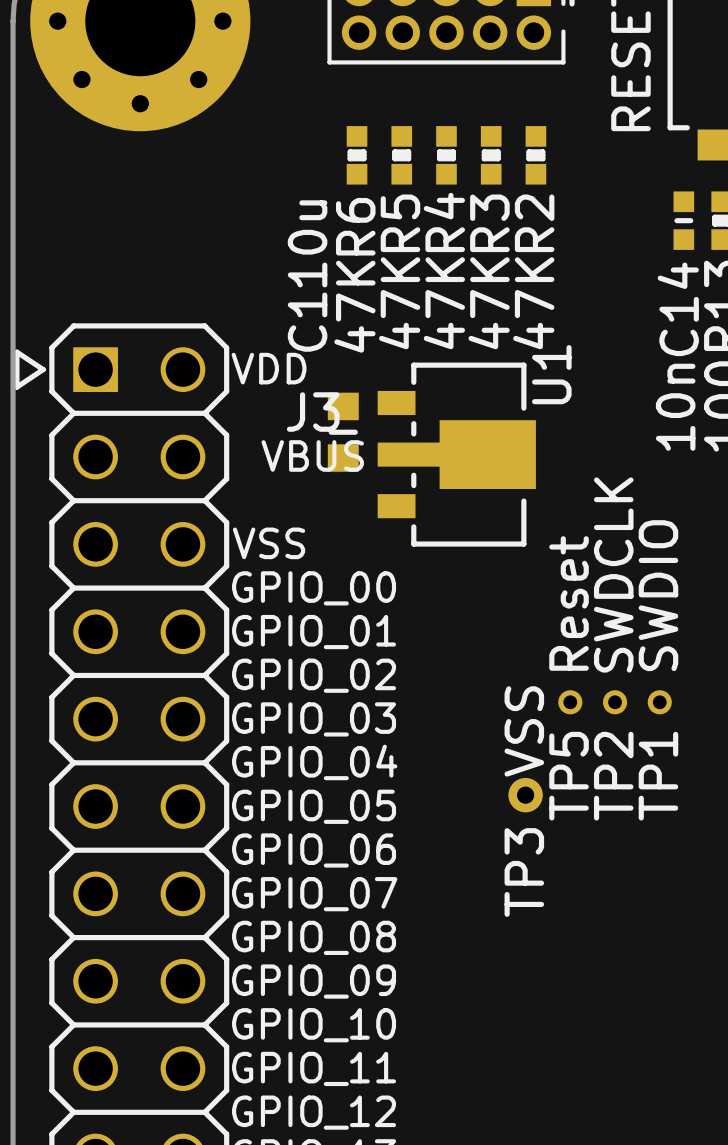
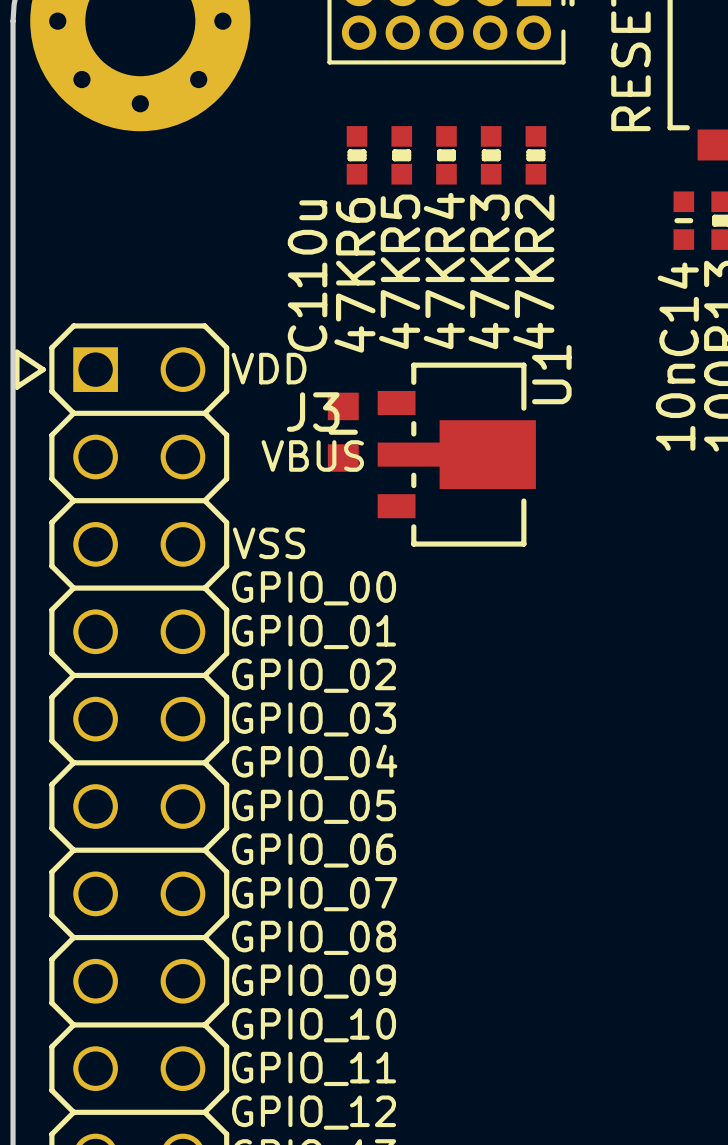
TP5: Reset (570, 702) -> none
TP2: SWDCLK (615, 702) -> none
TP1: SWDIO (659, 702) -> none
TP3: VSS (525, 795) -> none

